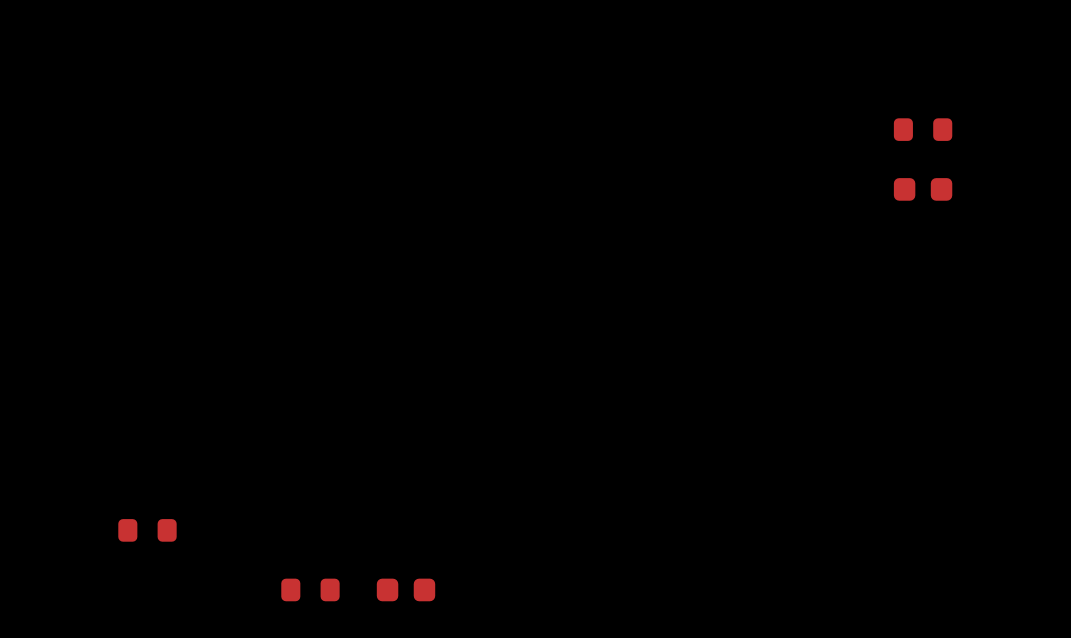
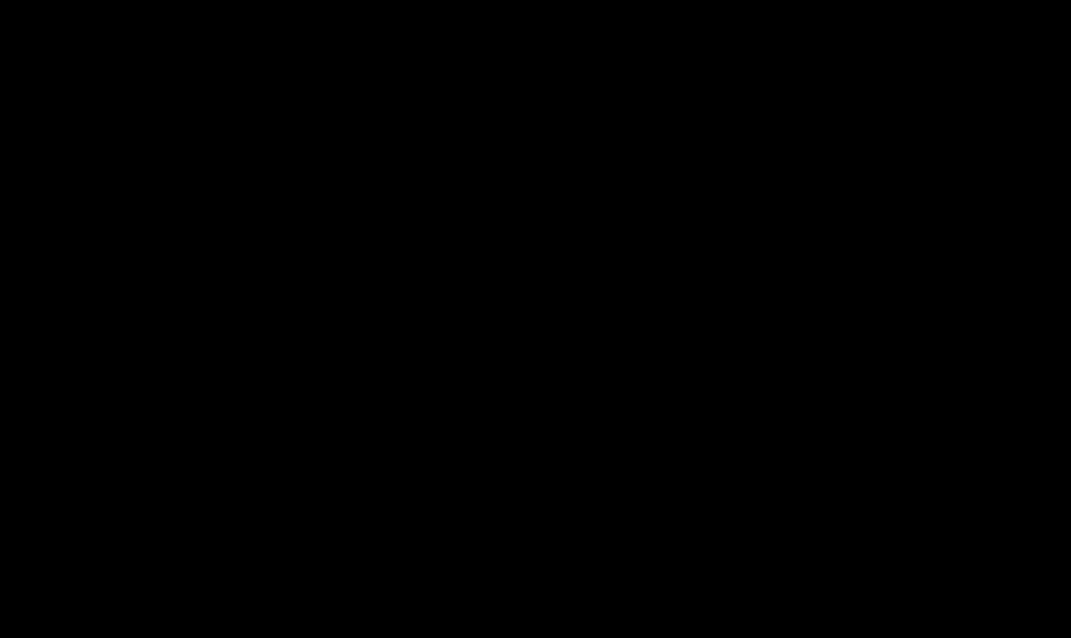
part: (923, 129) -> none
part: (923, 189) -> none
part: (147, 530) -> none
part: (310, 589) -> none
part: (406, 589) -> none

